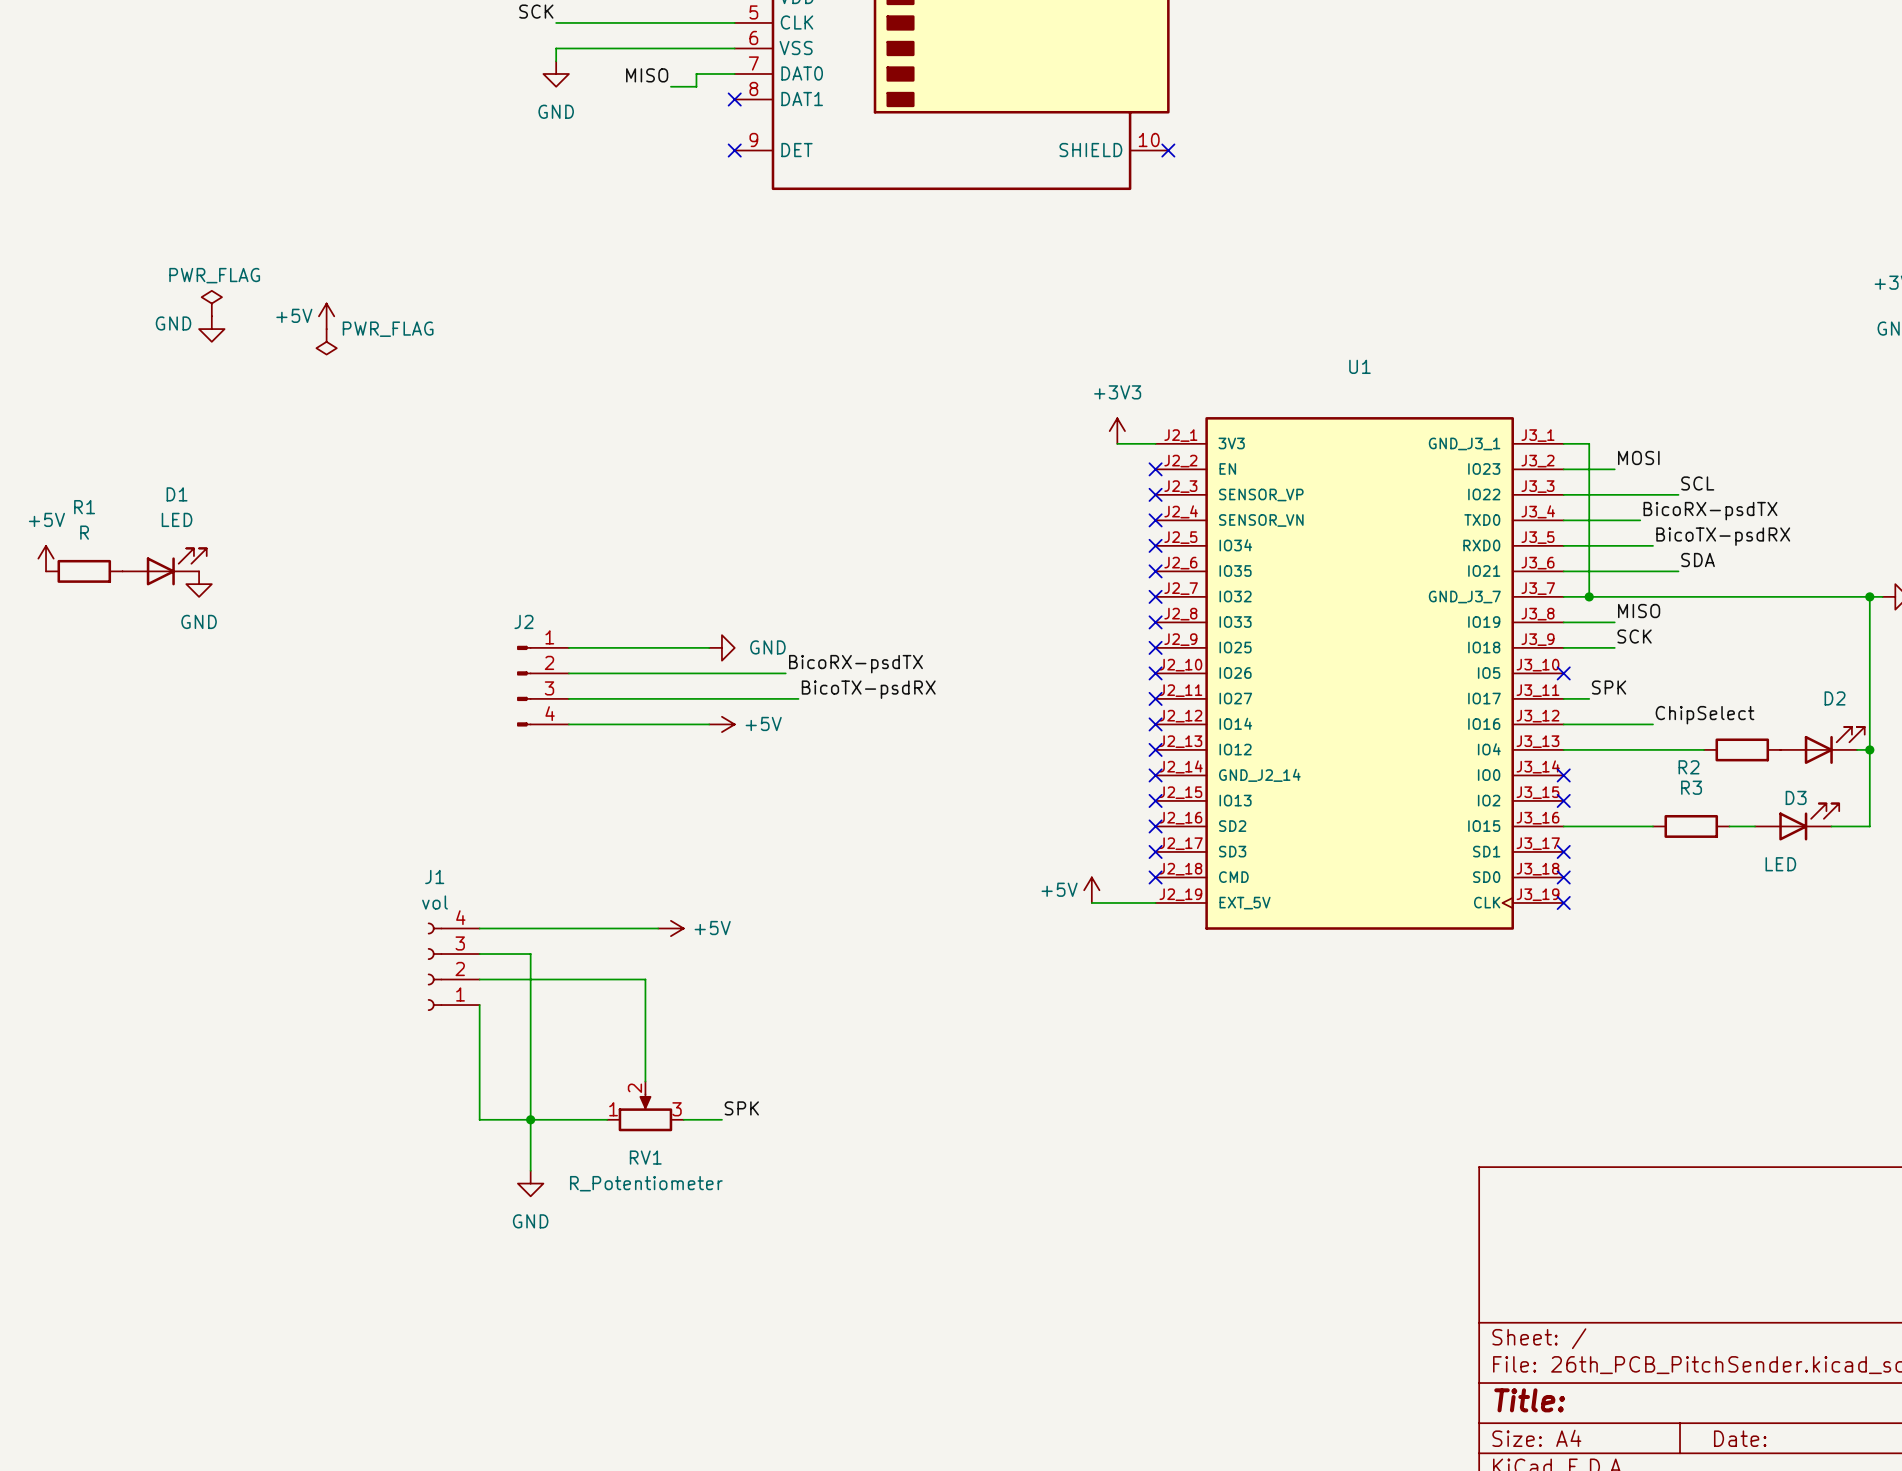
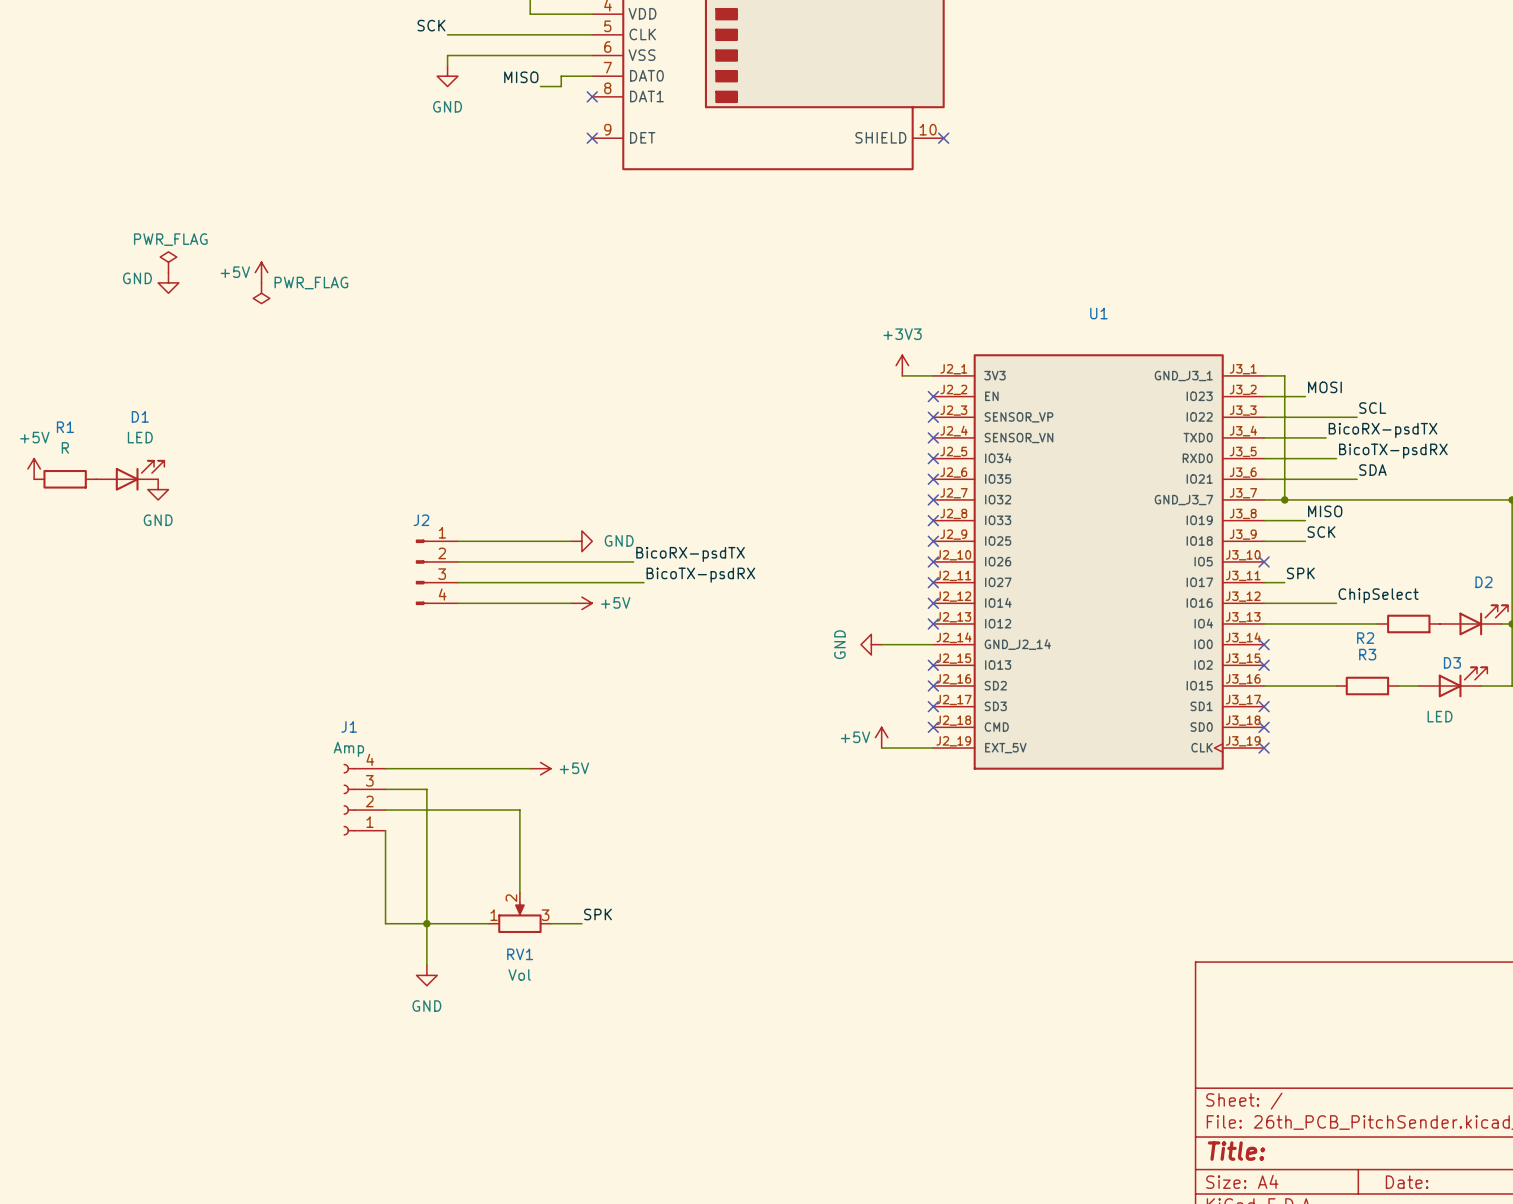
power symbol: none -> GND (871, 644)
wire: none -> (881, 644) (933, 644)
no-connect mark: (1155, 775) -> none
J1 value: vol (435, 902) -> Amp (348, 749)
RV1 value: R_Potentiometer (646, 1183) -> Vol (519, 975)

